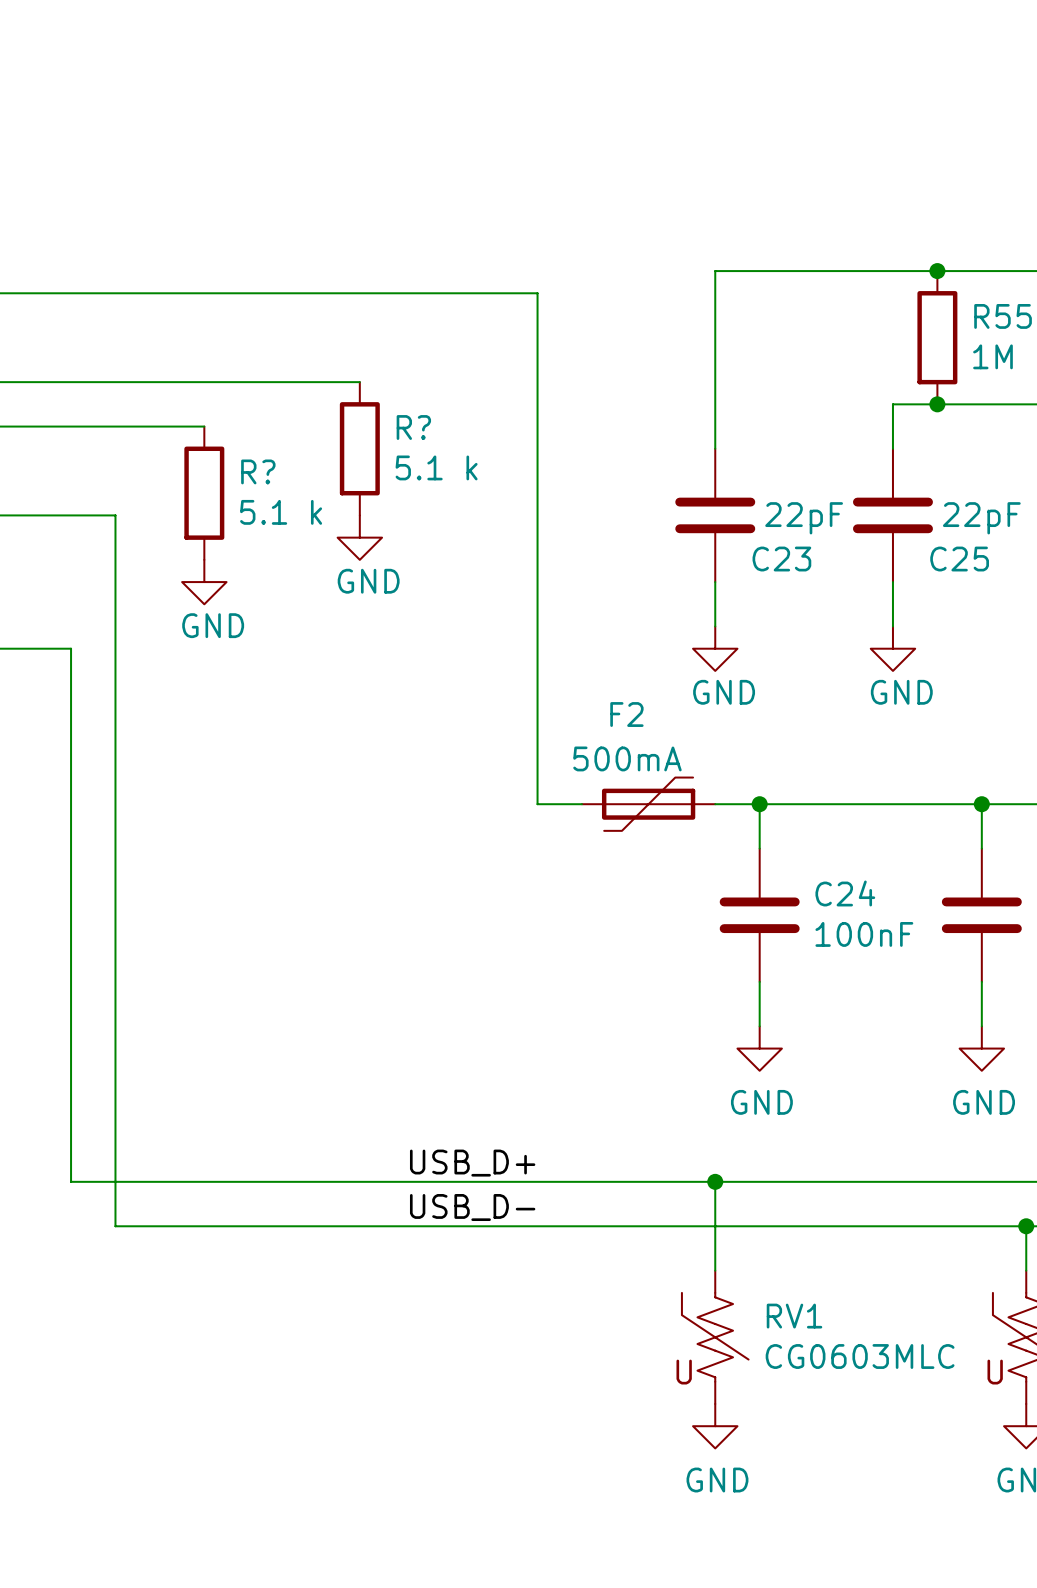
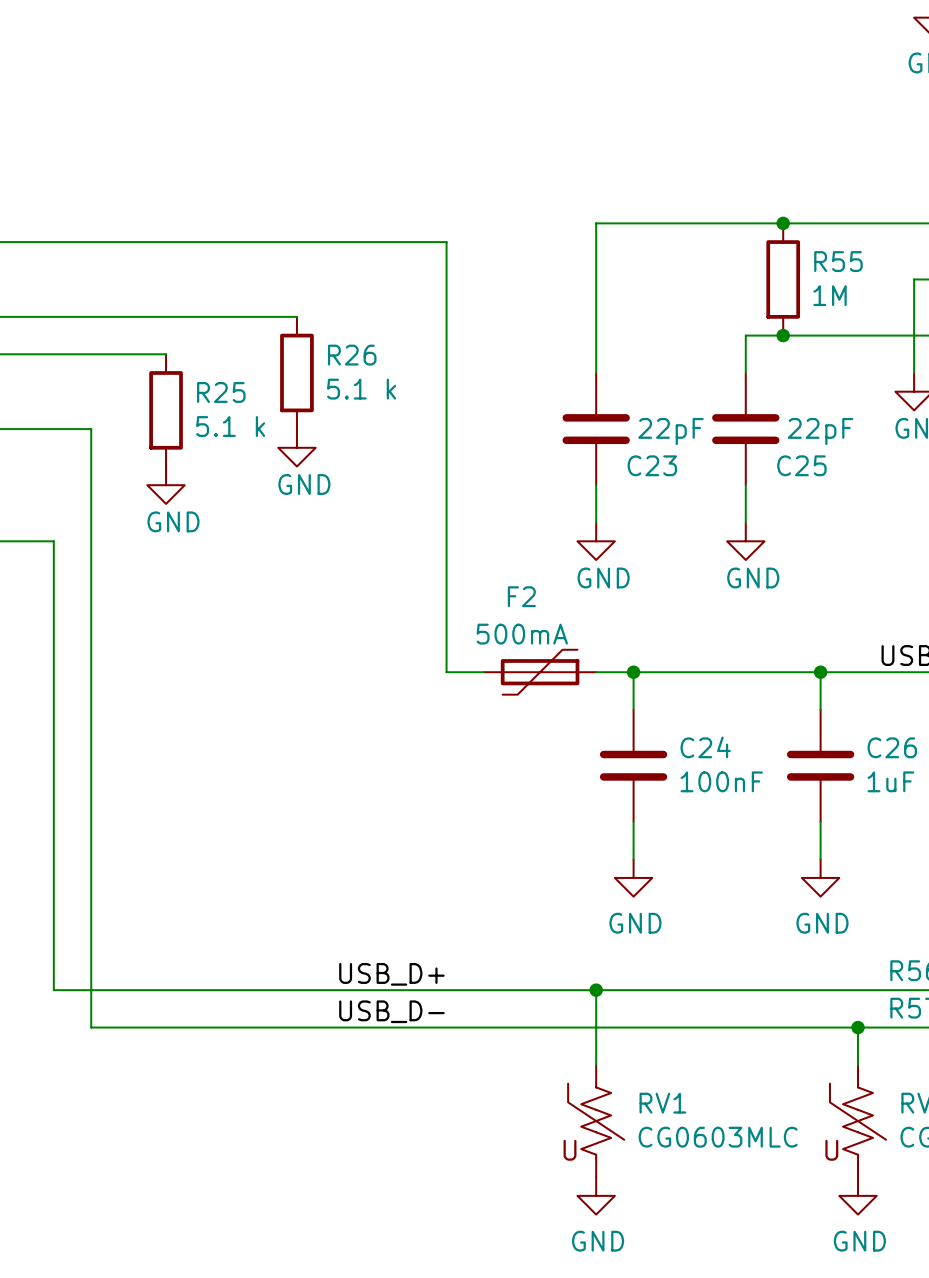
R? name: R? (413, 427) -> R26 (352, 355)
R? name: R? (258, 471) -> R25 (221, 392)

